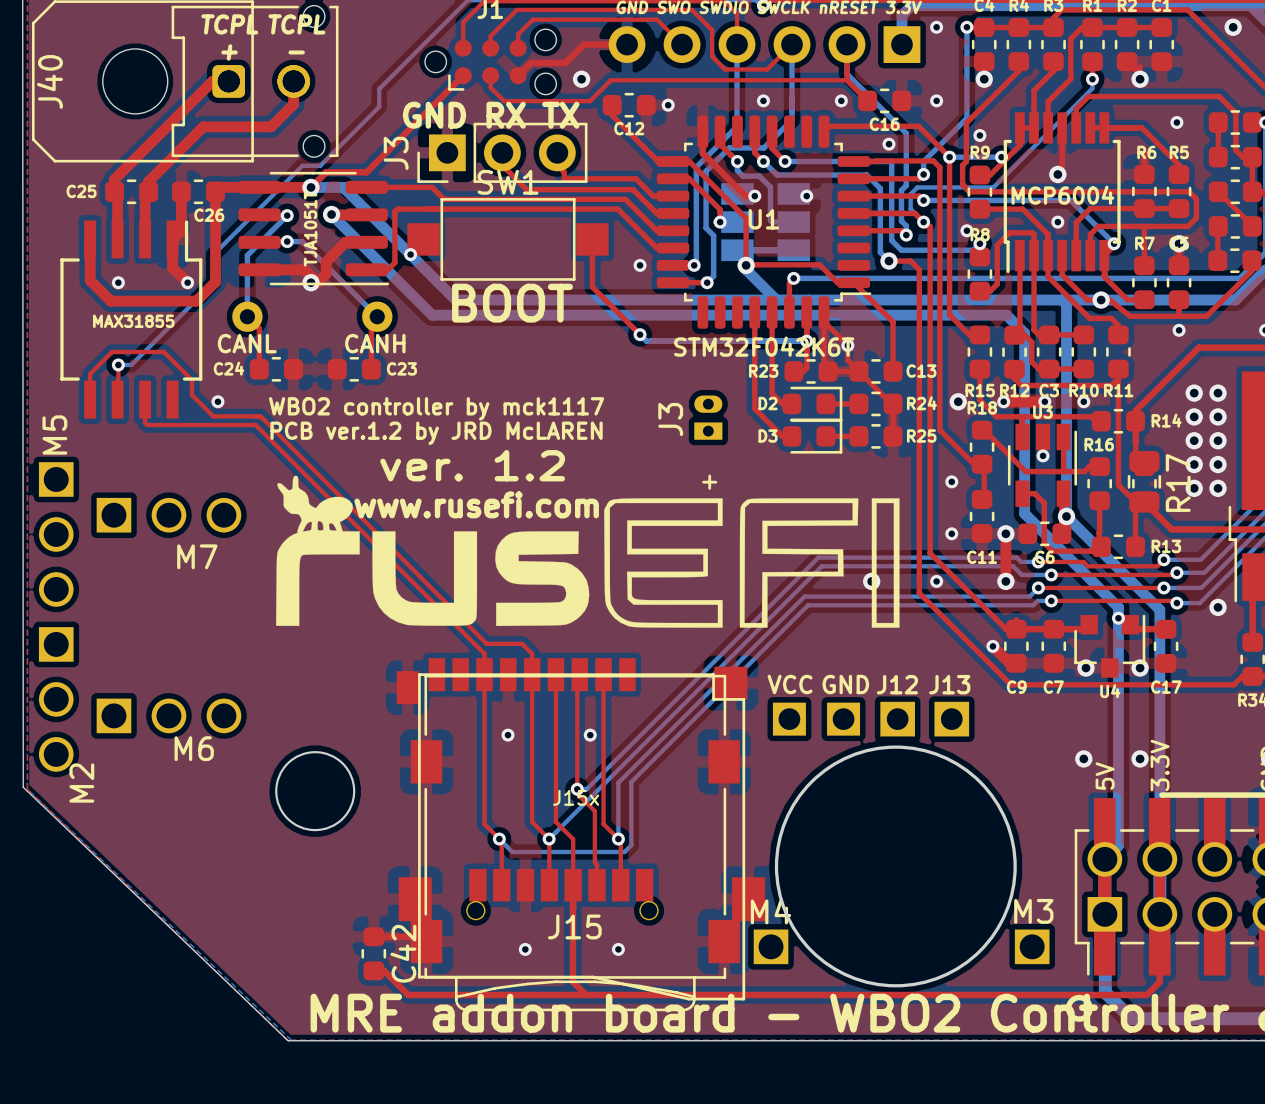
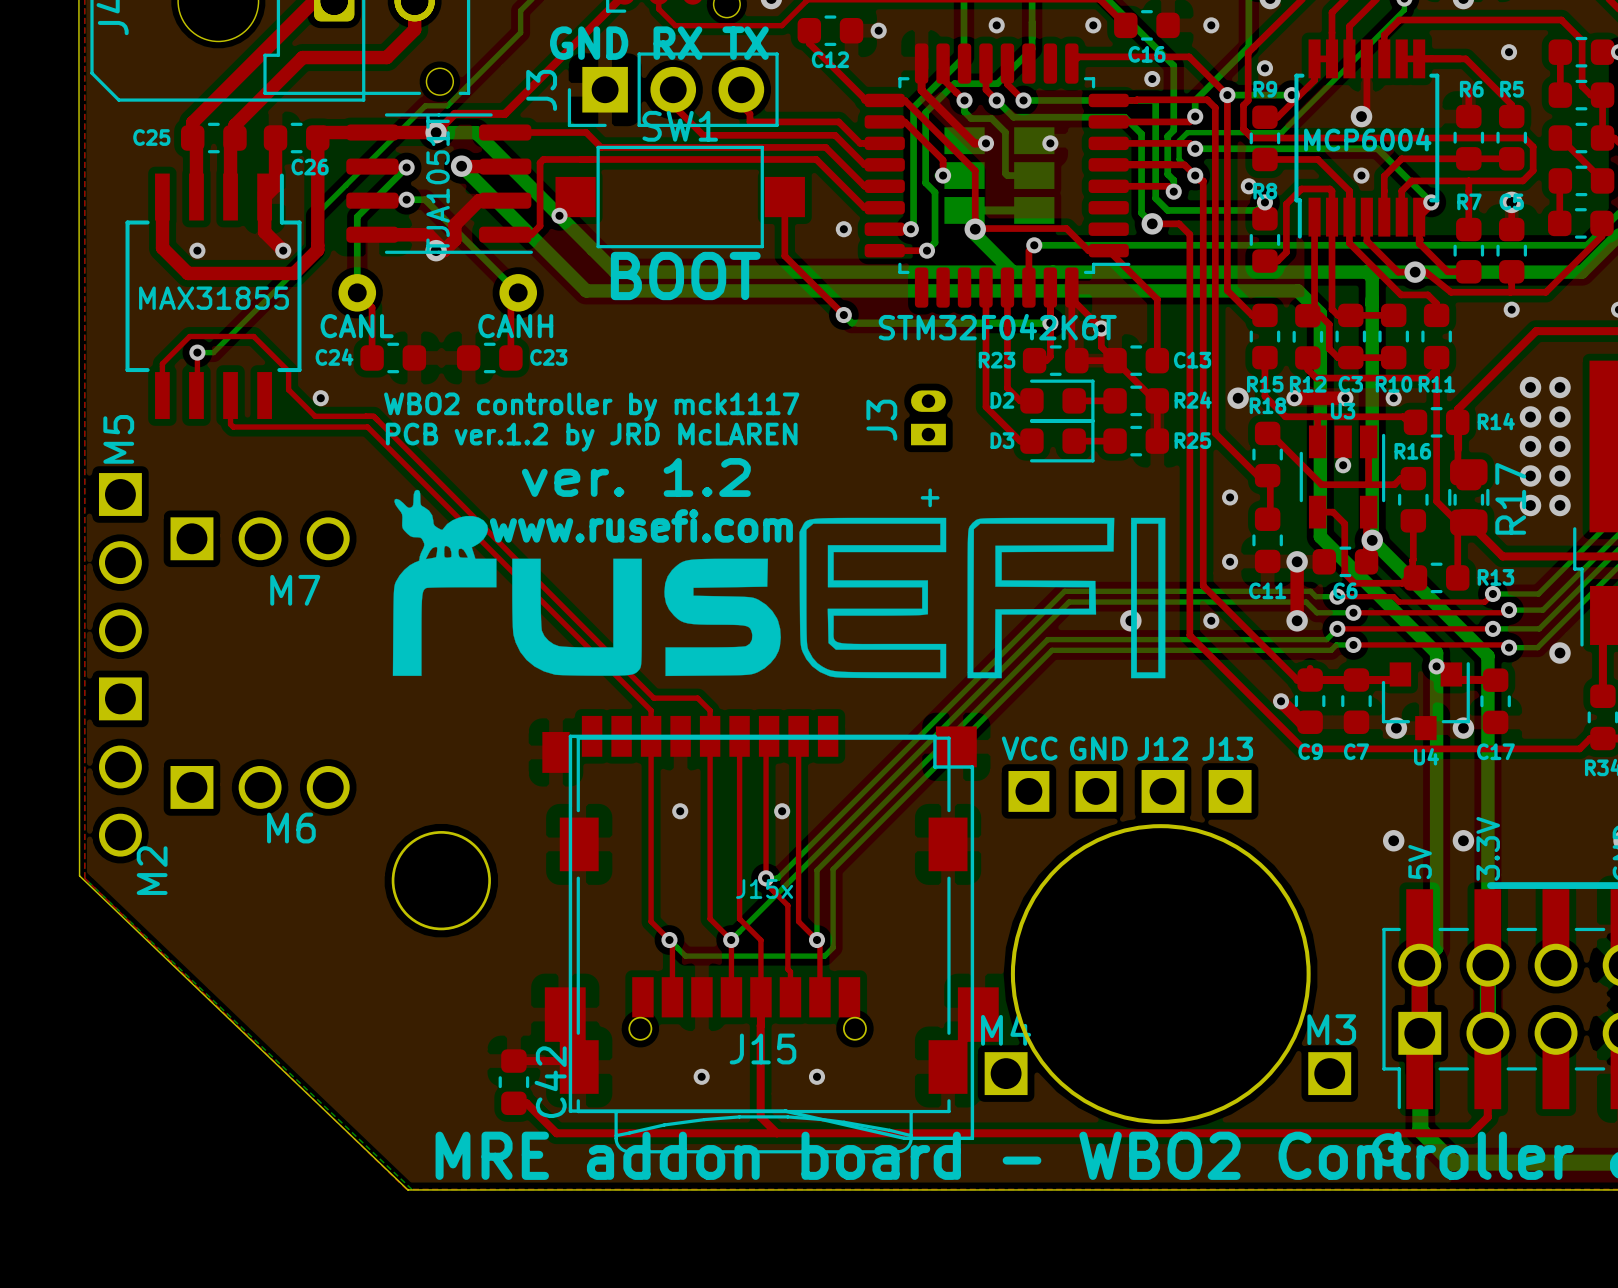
MCP6004 name: none -> MCP6004 (1367, 139)
text: MCP6004 (1062, 195) -> none
U1 name: U1 (763, 219) -> STM32F042K6T (997, 327)
text: TJA1051T (310, 228) -> none
TJA1051T name: none -> TJA1051T (438, 183)
MAX31855 name: none -> MAX31855 (213, 298)
text: MAX31855 (133, 321) -> none
text: STM32F042K6T (764, 346) -> none

